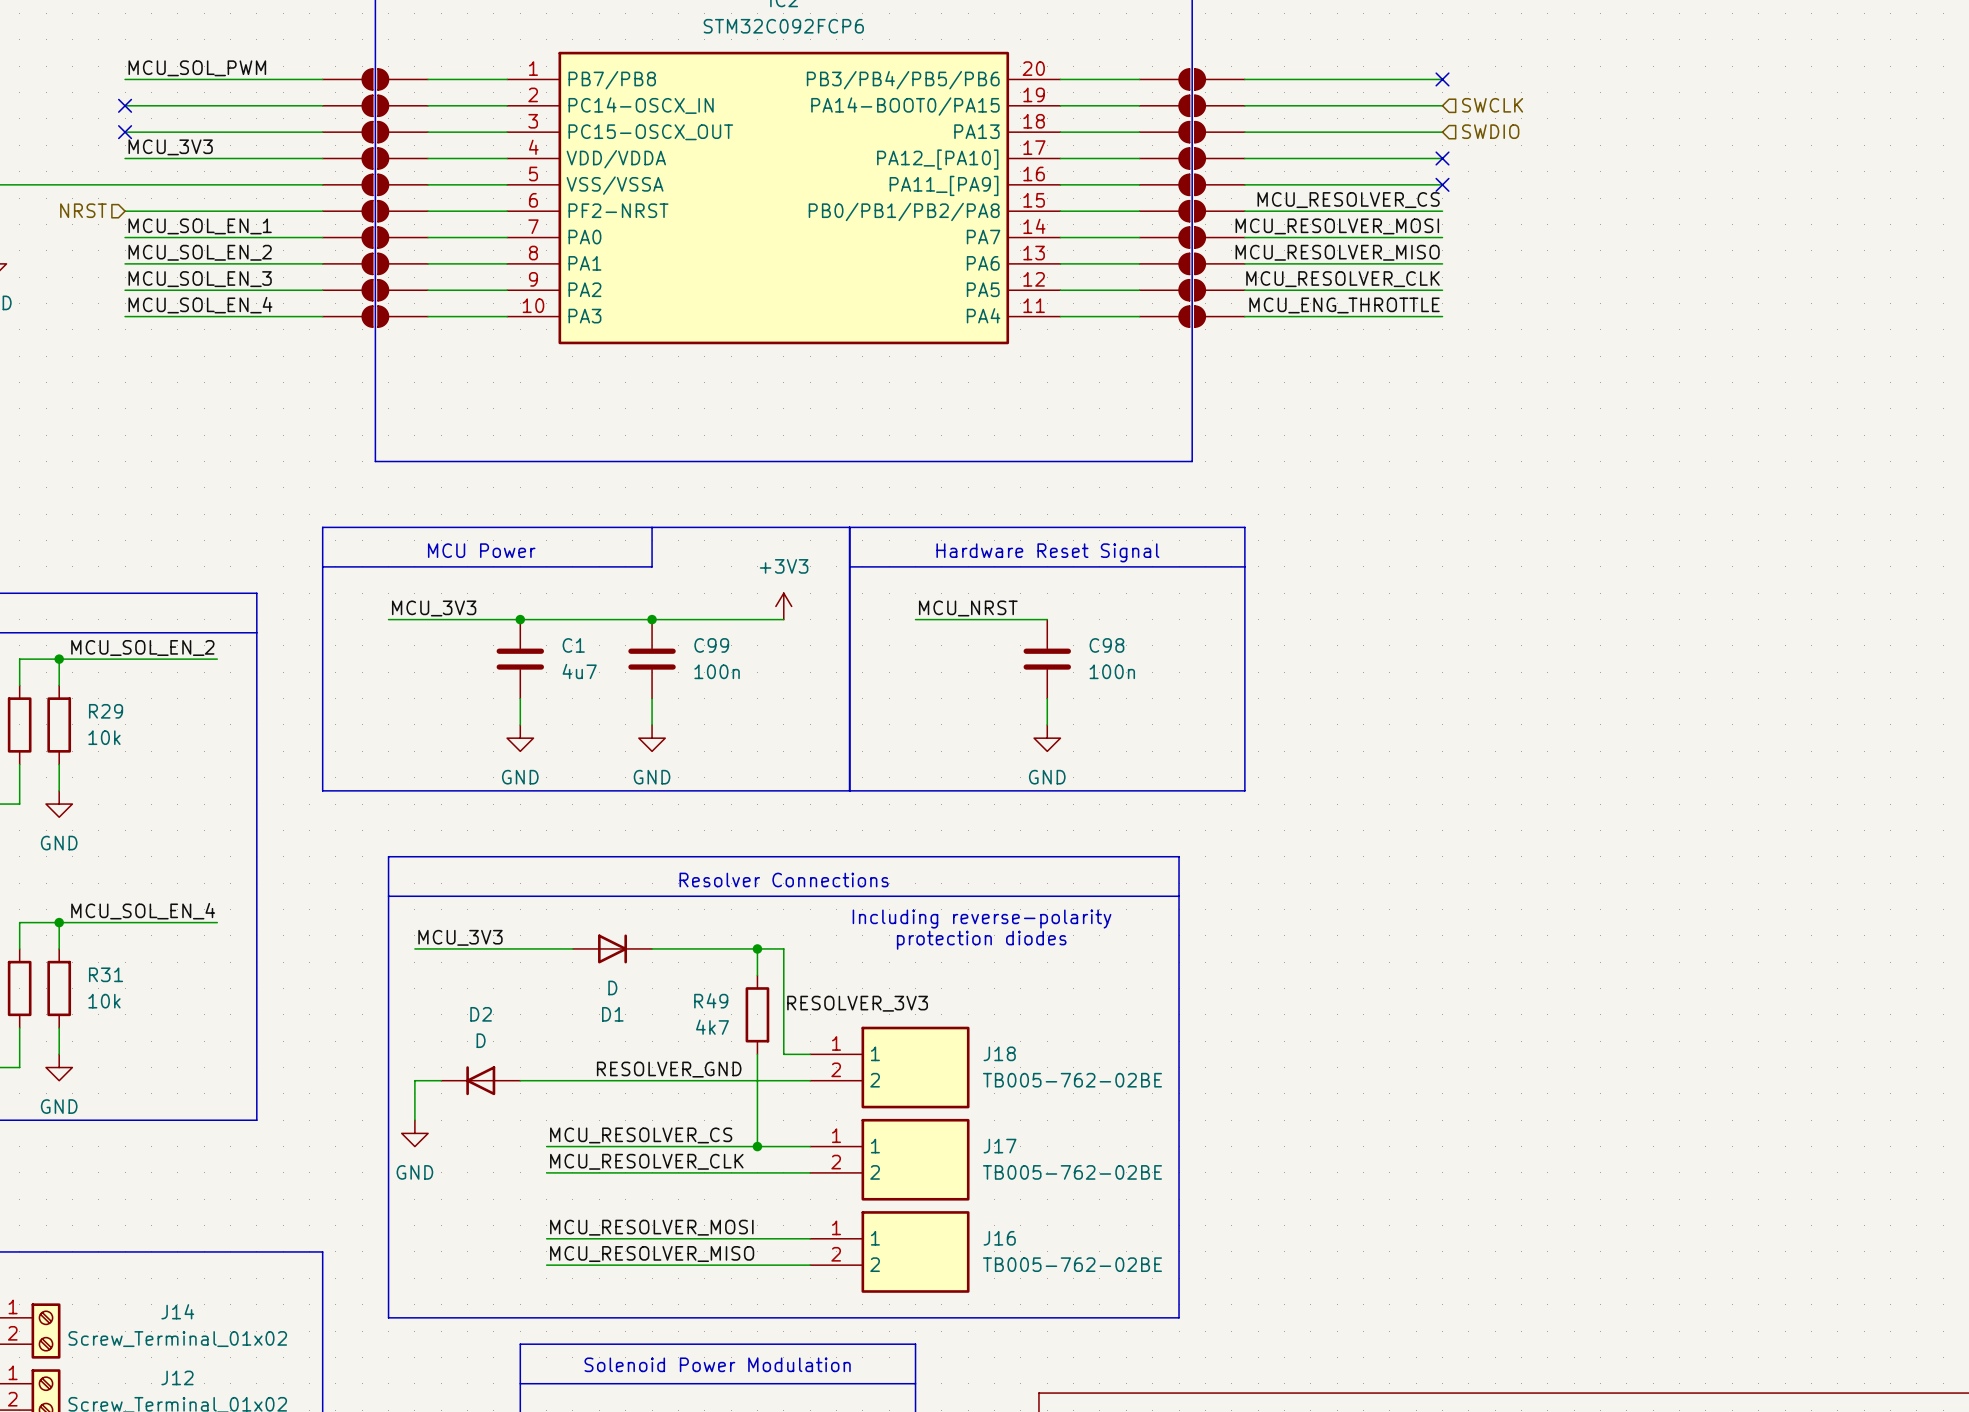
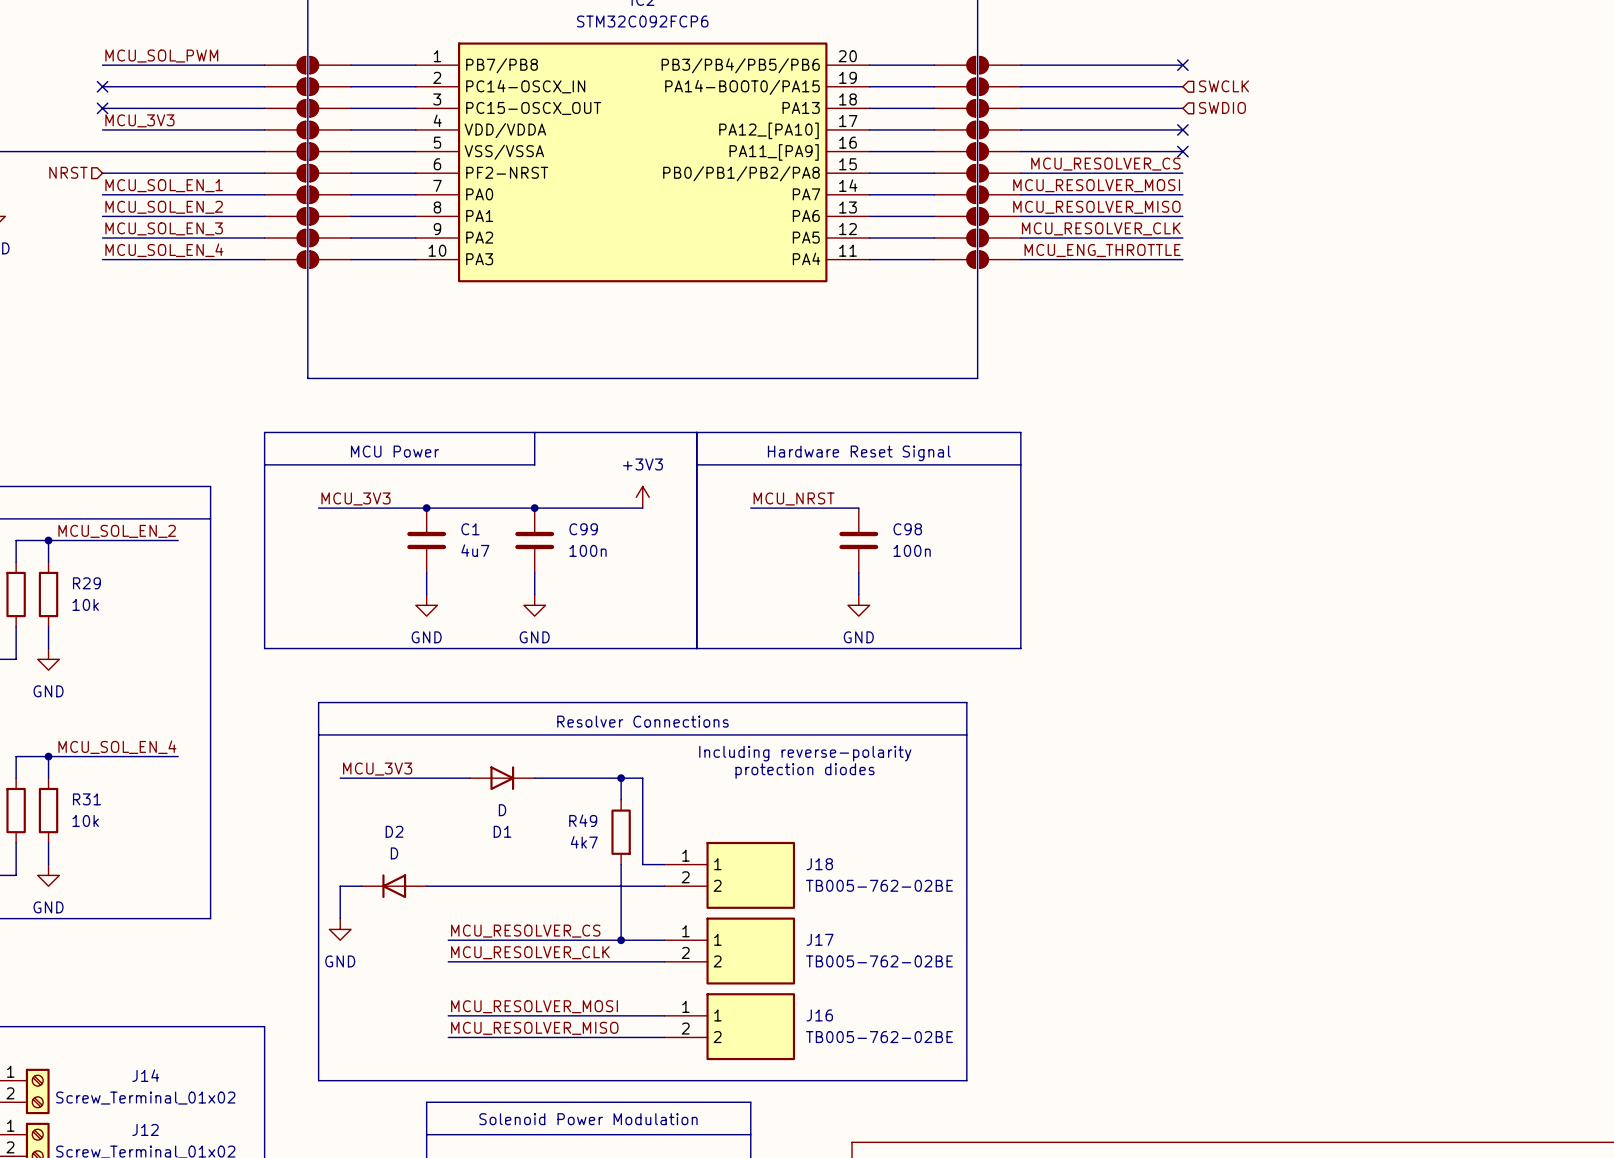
label: RESOLVER_3V3 (857, 1003) -> none
label: RESOLVER_GND (669, 1069) -> none

